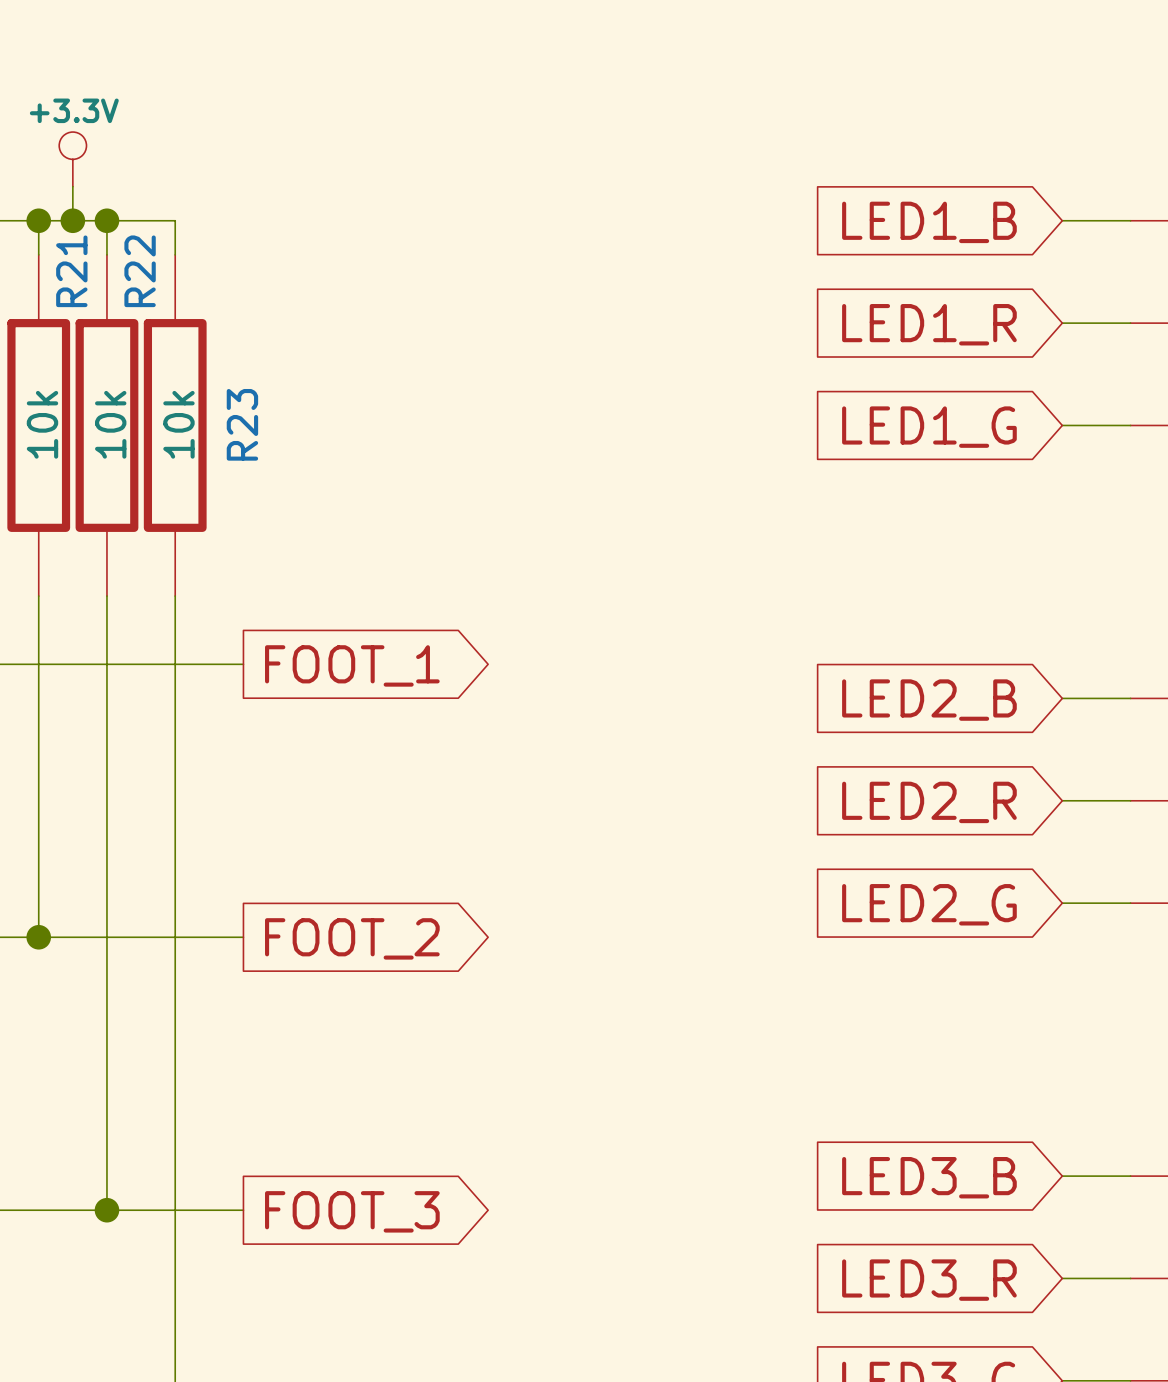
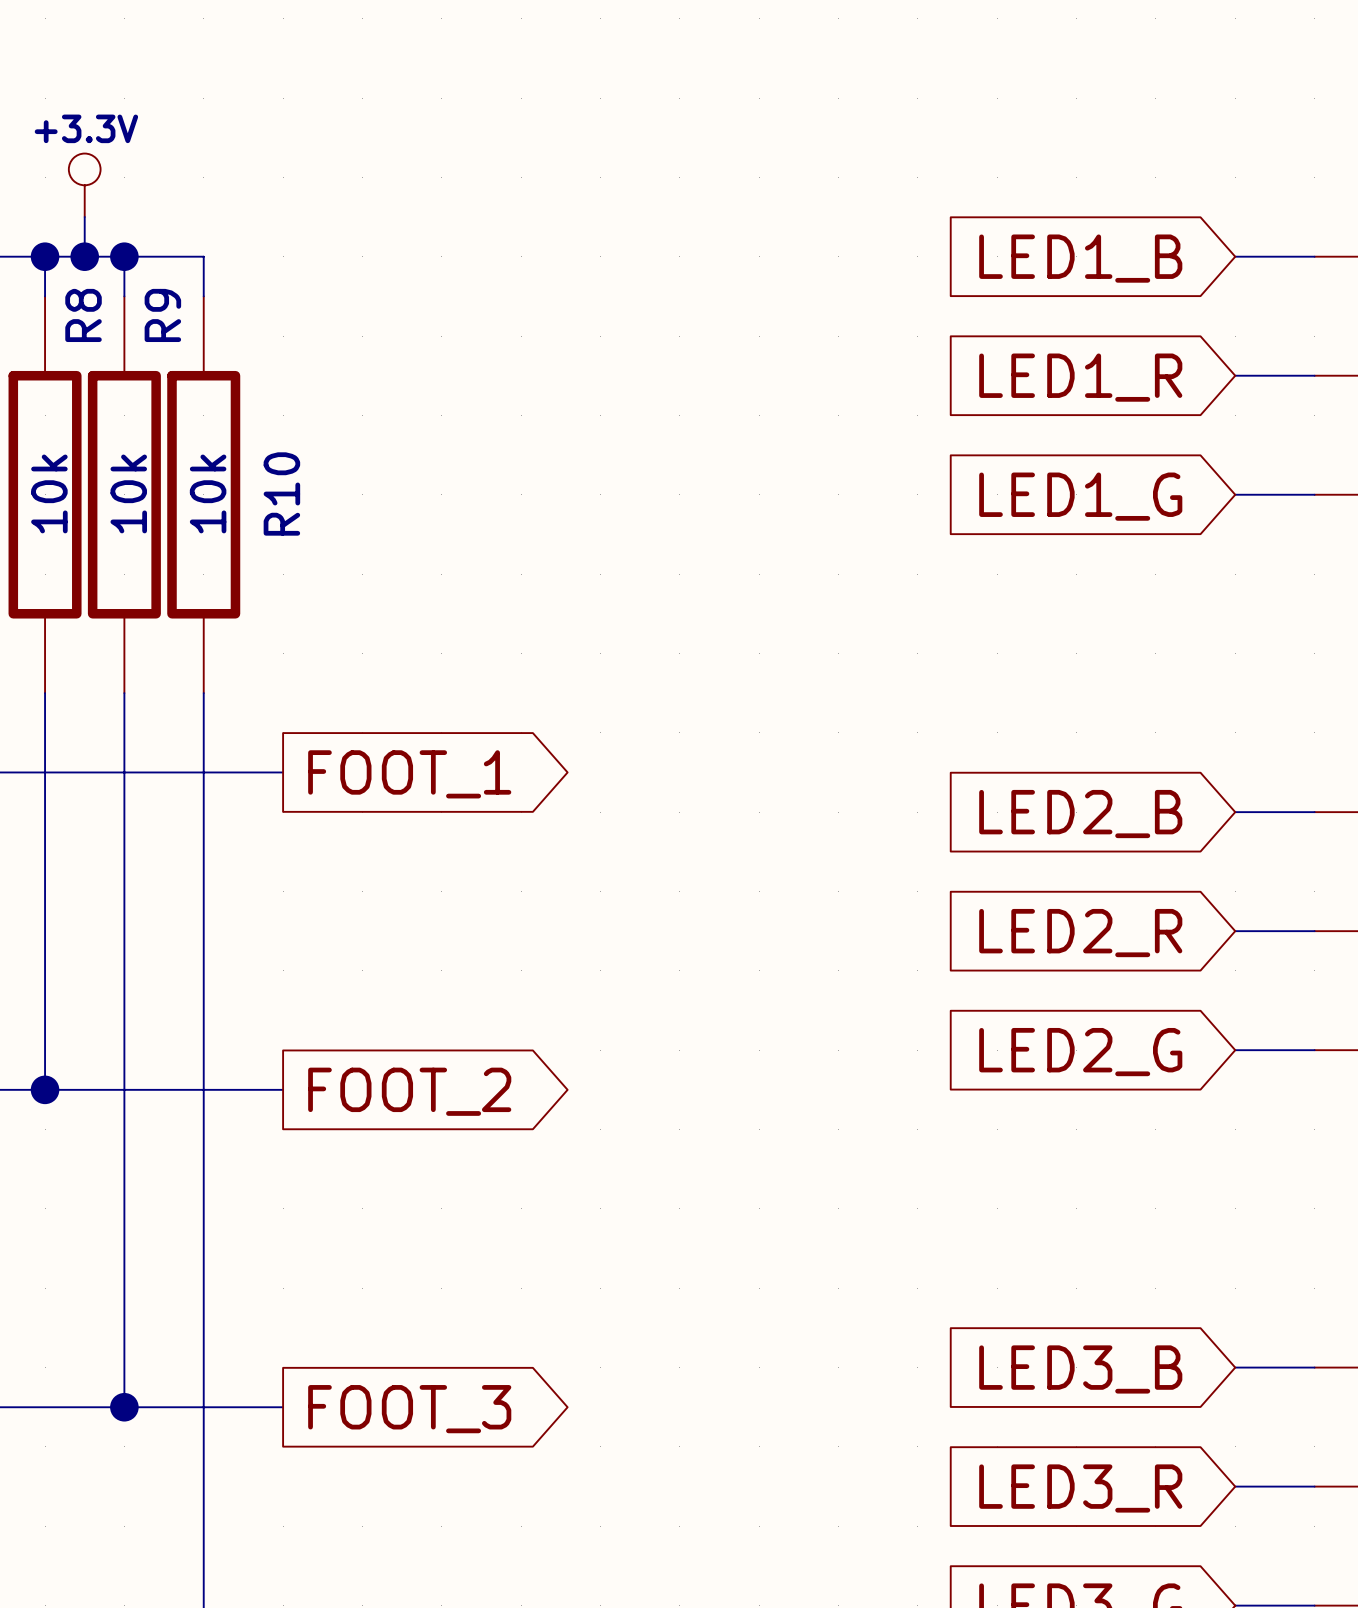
R21 name: R21 (71, 271) -> R8 (83, 315)
R22 name: R22 (140, 271) -> R9 (162, 315)
R23 name: R23 (242, 424) -> R10 (281, 493)

